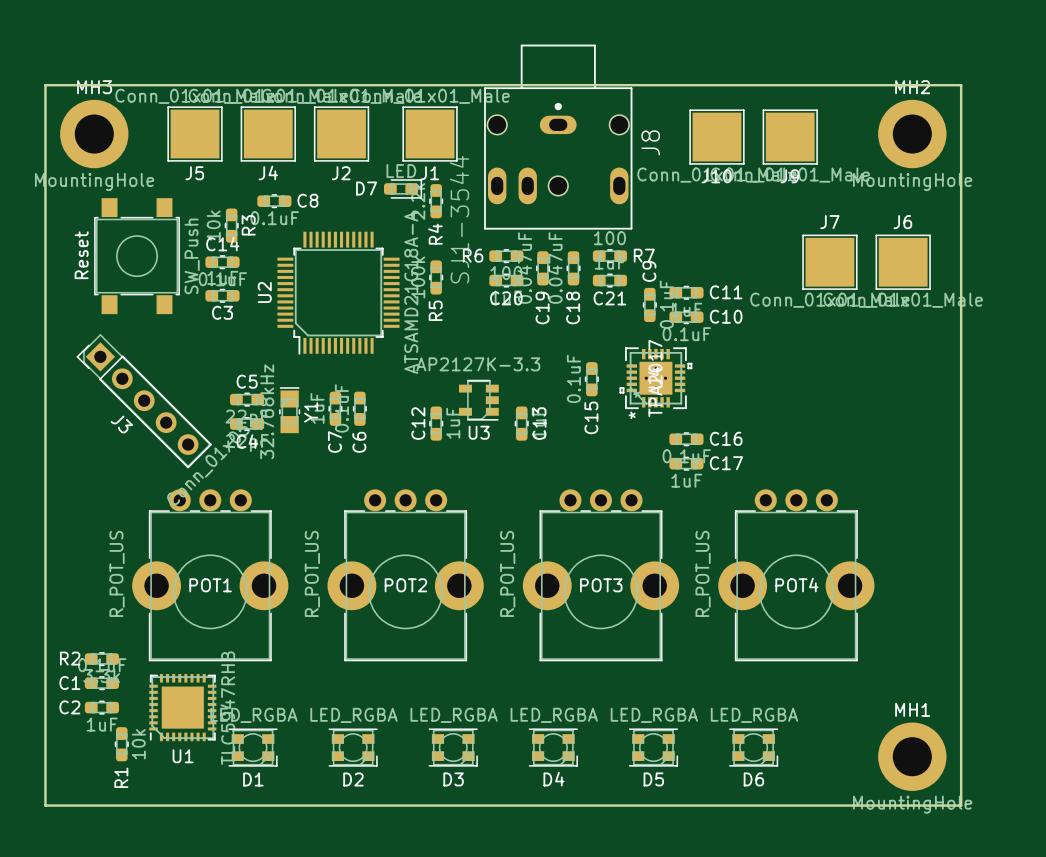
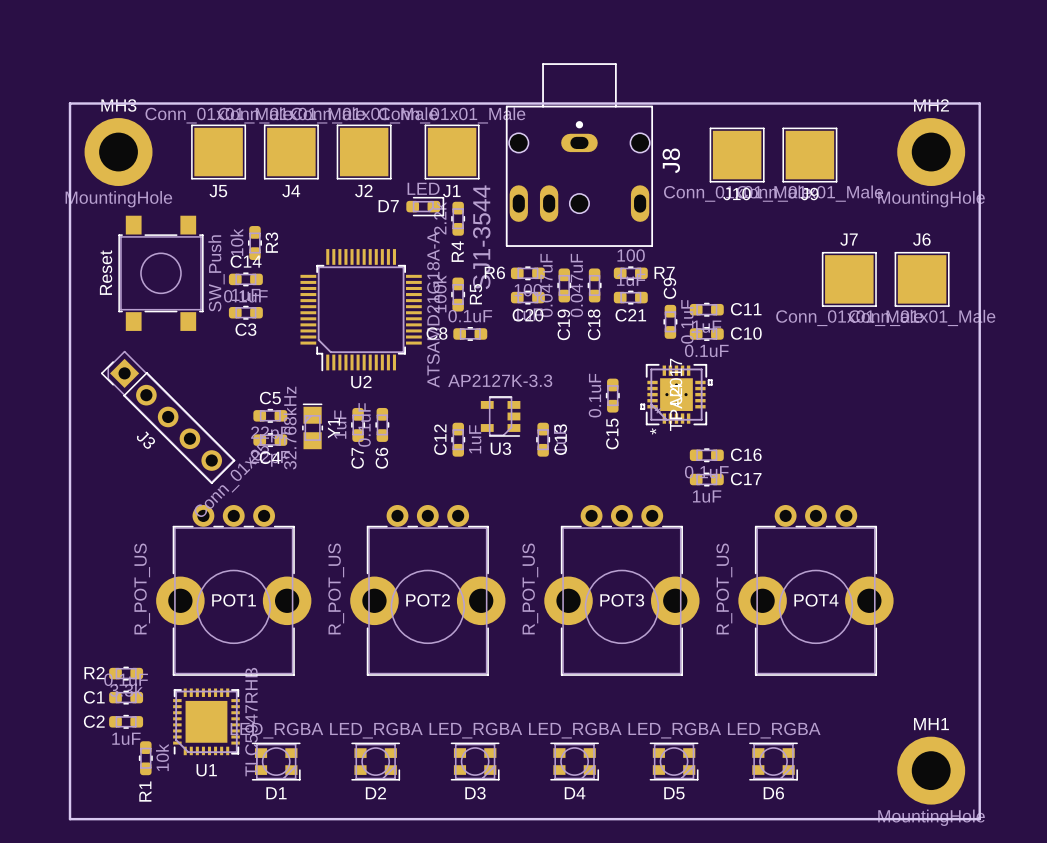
C8 name position: C8 (307, 200) -> C8 (436, 333)
C8 position: (274, 201) -> (470, 333)
C8 value position: 0.1uF (274, 218) -> 0.1uF (470, 316)
U2 name rotation: 0° (264, 292) -> 90° clockwise (361, 382)
U2 name position: U2 (264, 292) -> U2 (361, 382)
R5 name position: R5 (435, 310) -> R5 (475, 294)

